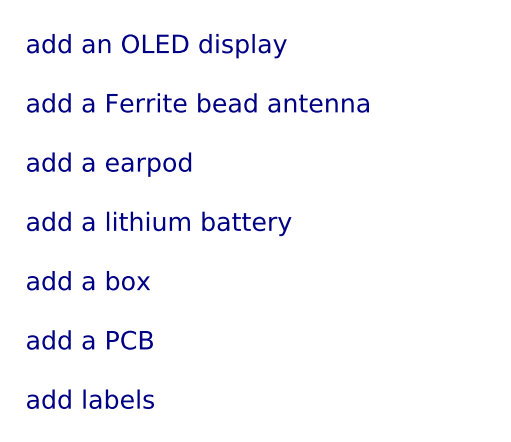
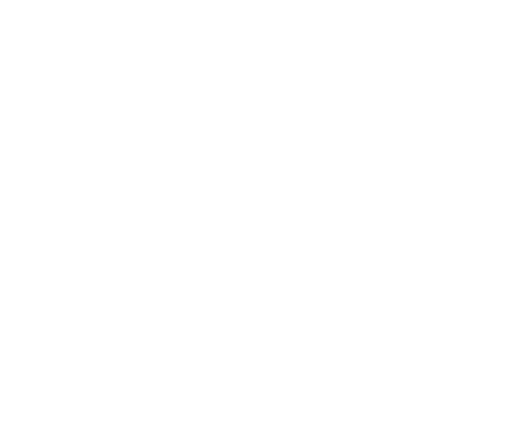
text: add an OLED display (156, 46) -> none
text: add a Ferrite bead antenna (198, 102) -> none
text: add a earpod (109, 164) -> none
text: add a lithium battery (159, 223) -> none
text: add a box (88, 280) -> none
text: add a PCB (89, 339) -> none
text: add labels (90, 399) -> none

